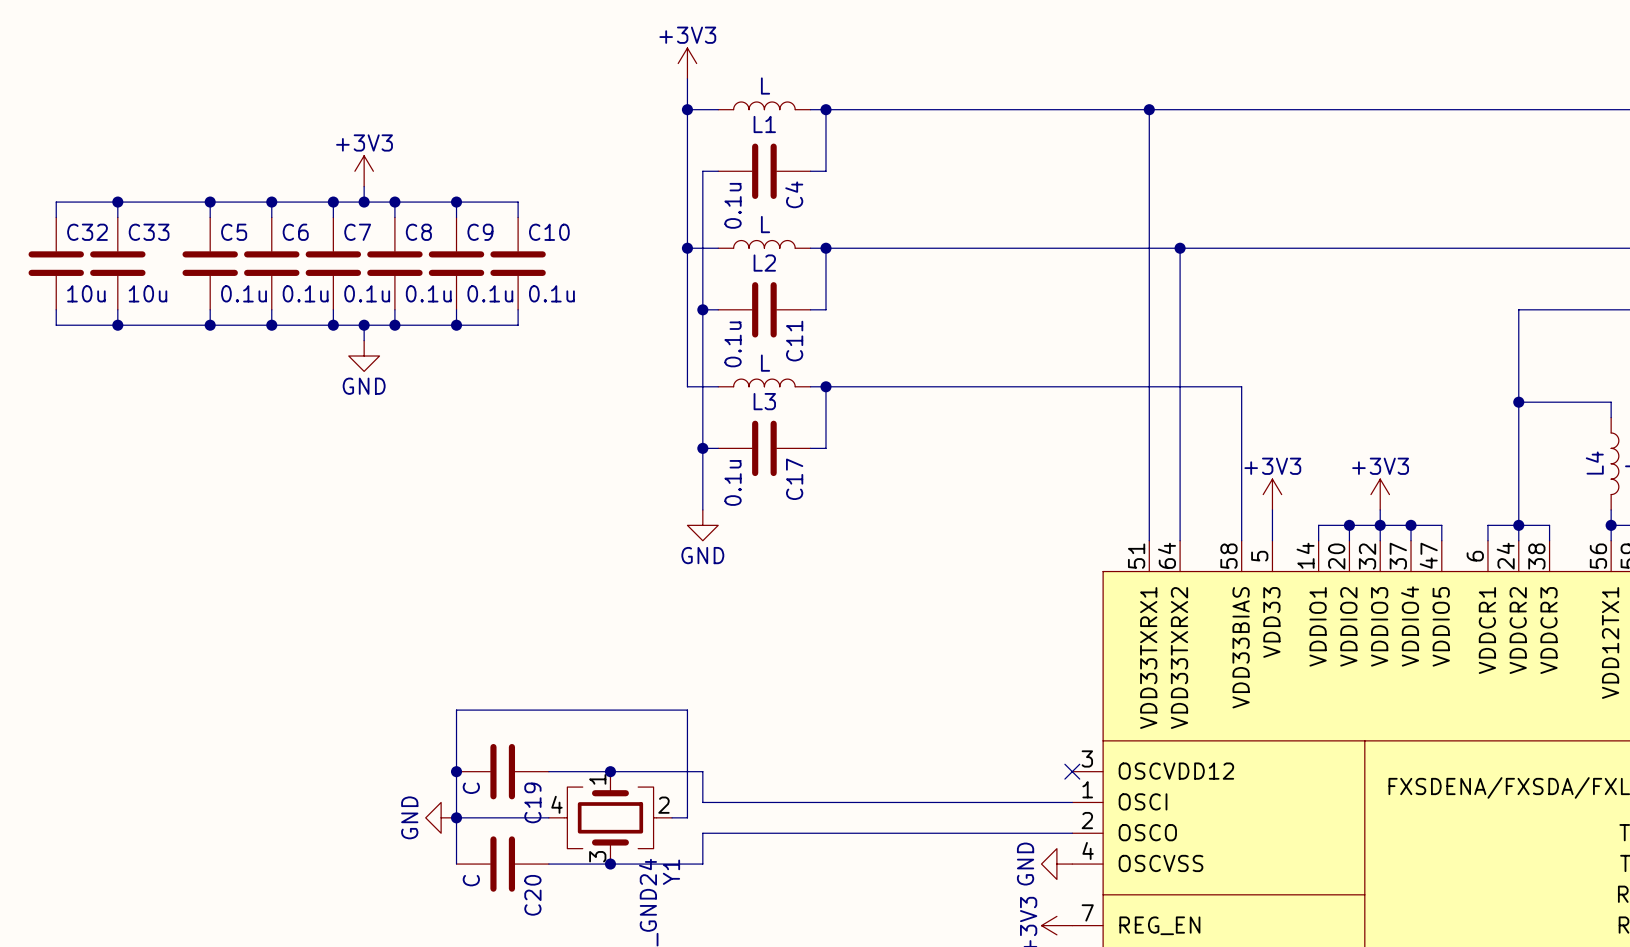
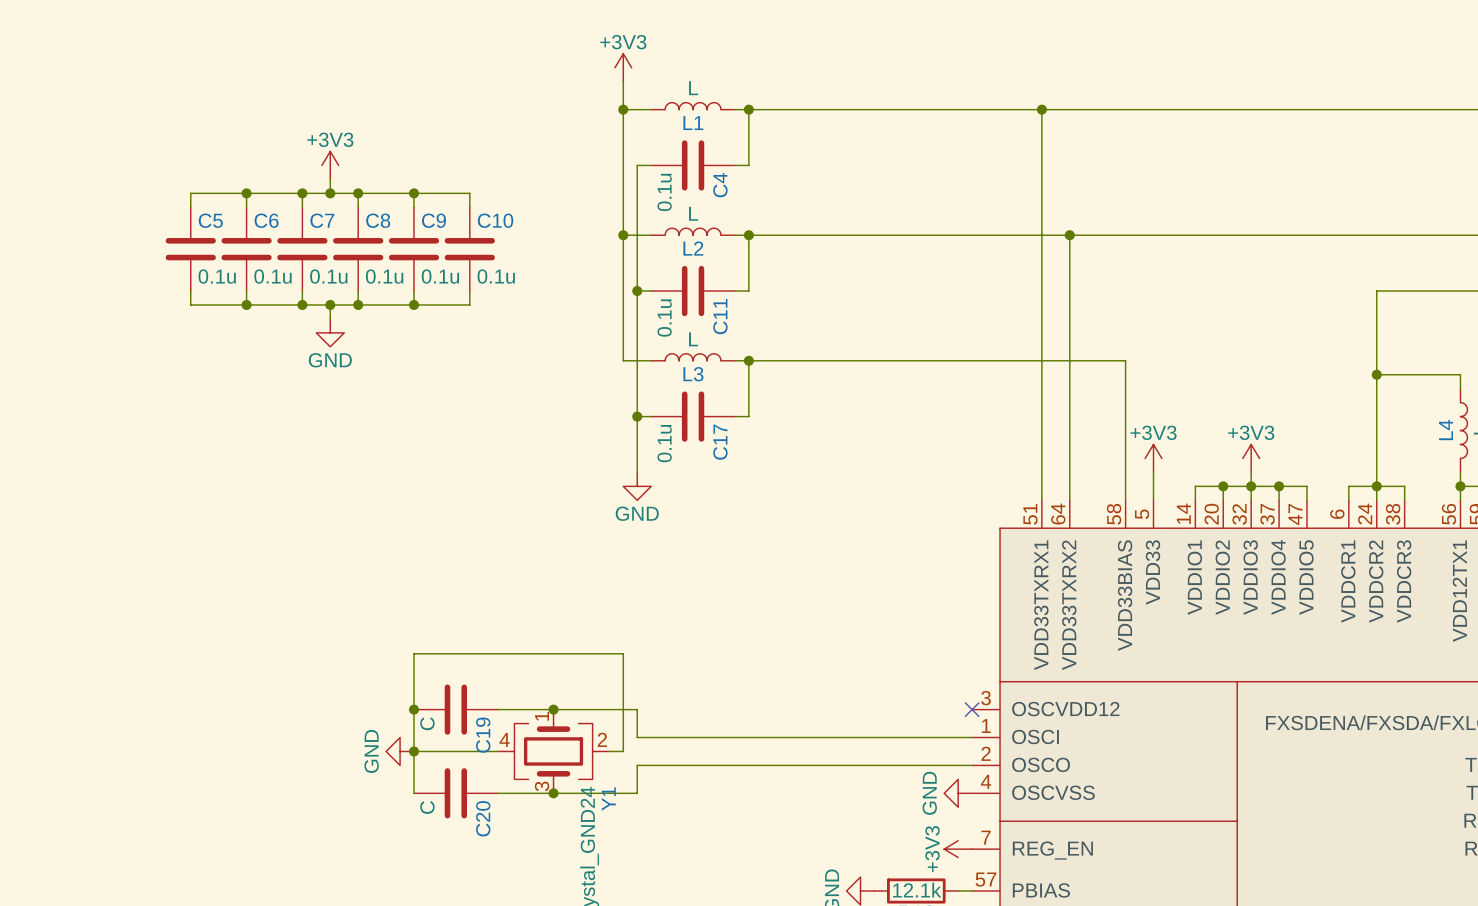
wire: (117, 202) (117, 217) -> none
junction: (117, 202) -> none
wire: (210, 202) (56, 202) (56, 217) -> none
junction: (210, 202) -> none
C32: 10u (56, 263) -> none
C33: 10u (117, 263) -> none
wire: (56, 309) (56, 325) (210, 325) -> none
wire: (117, 309) (117, 325) -> none
junction: (117, 325) -> none
junction: (210, 325) -> none

